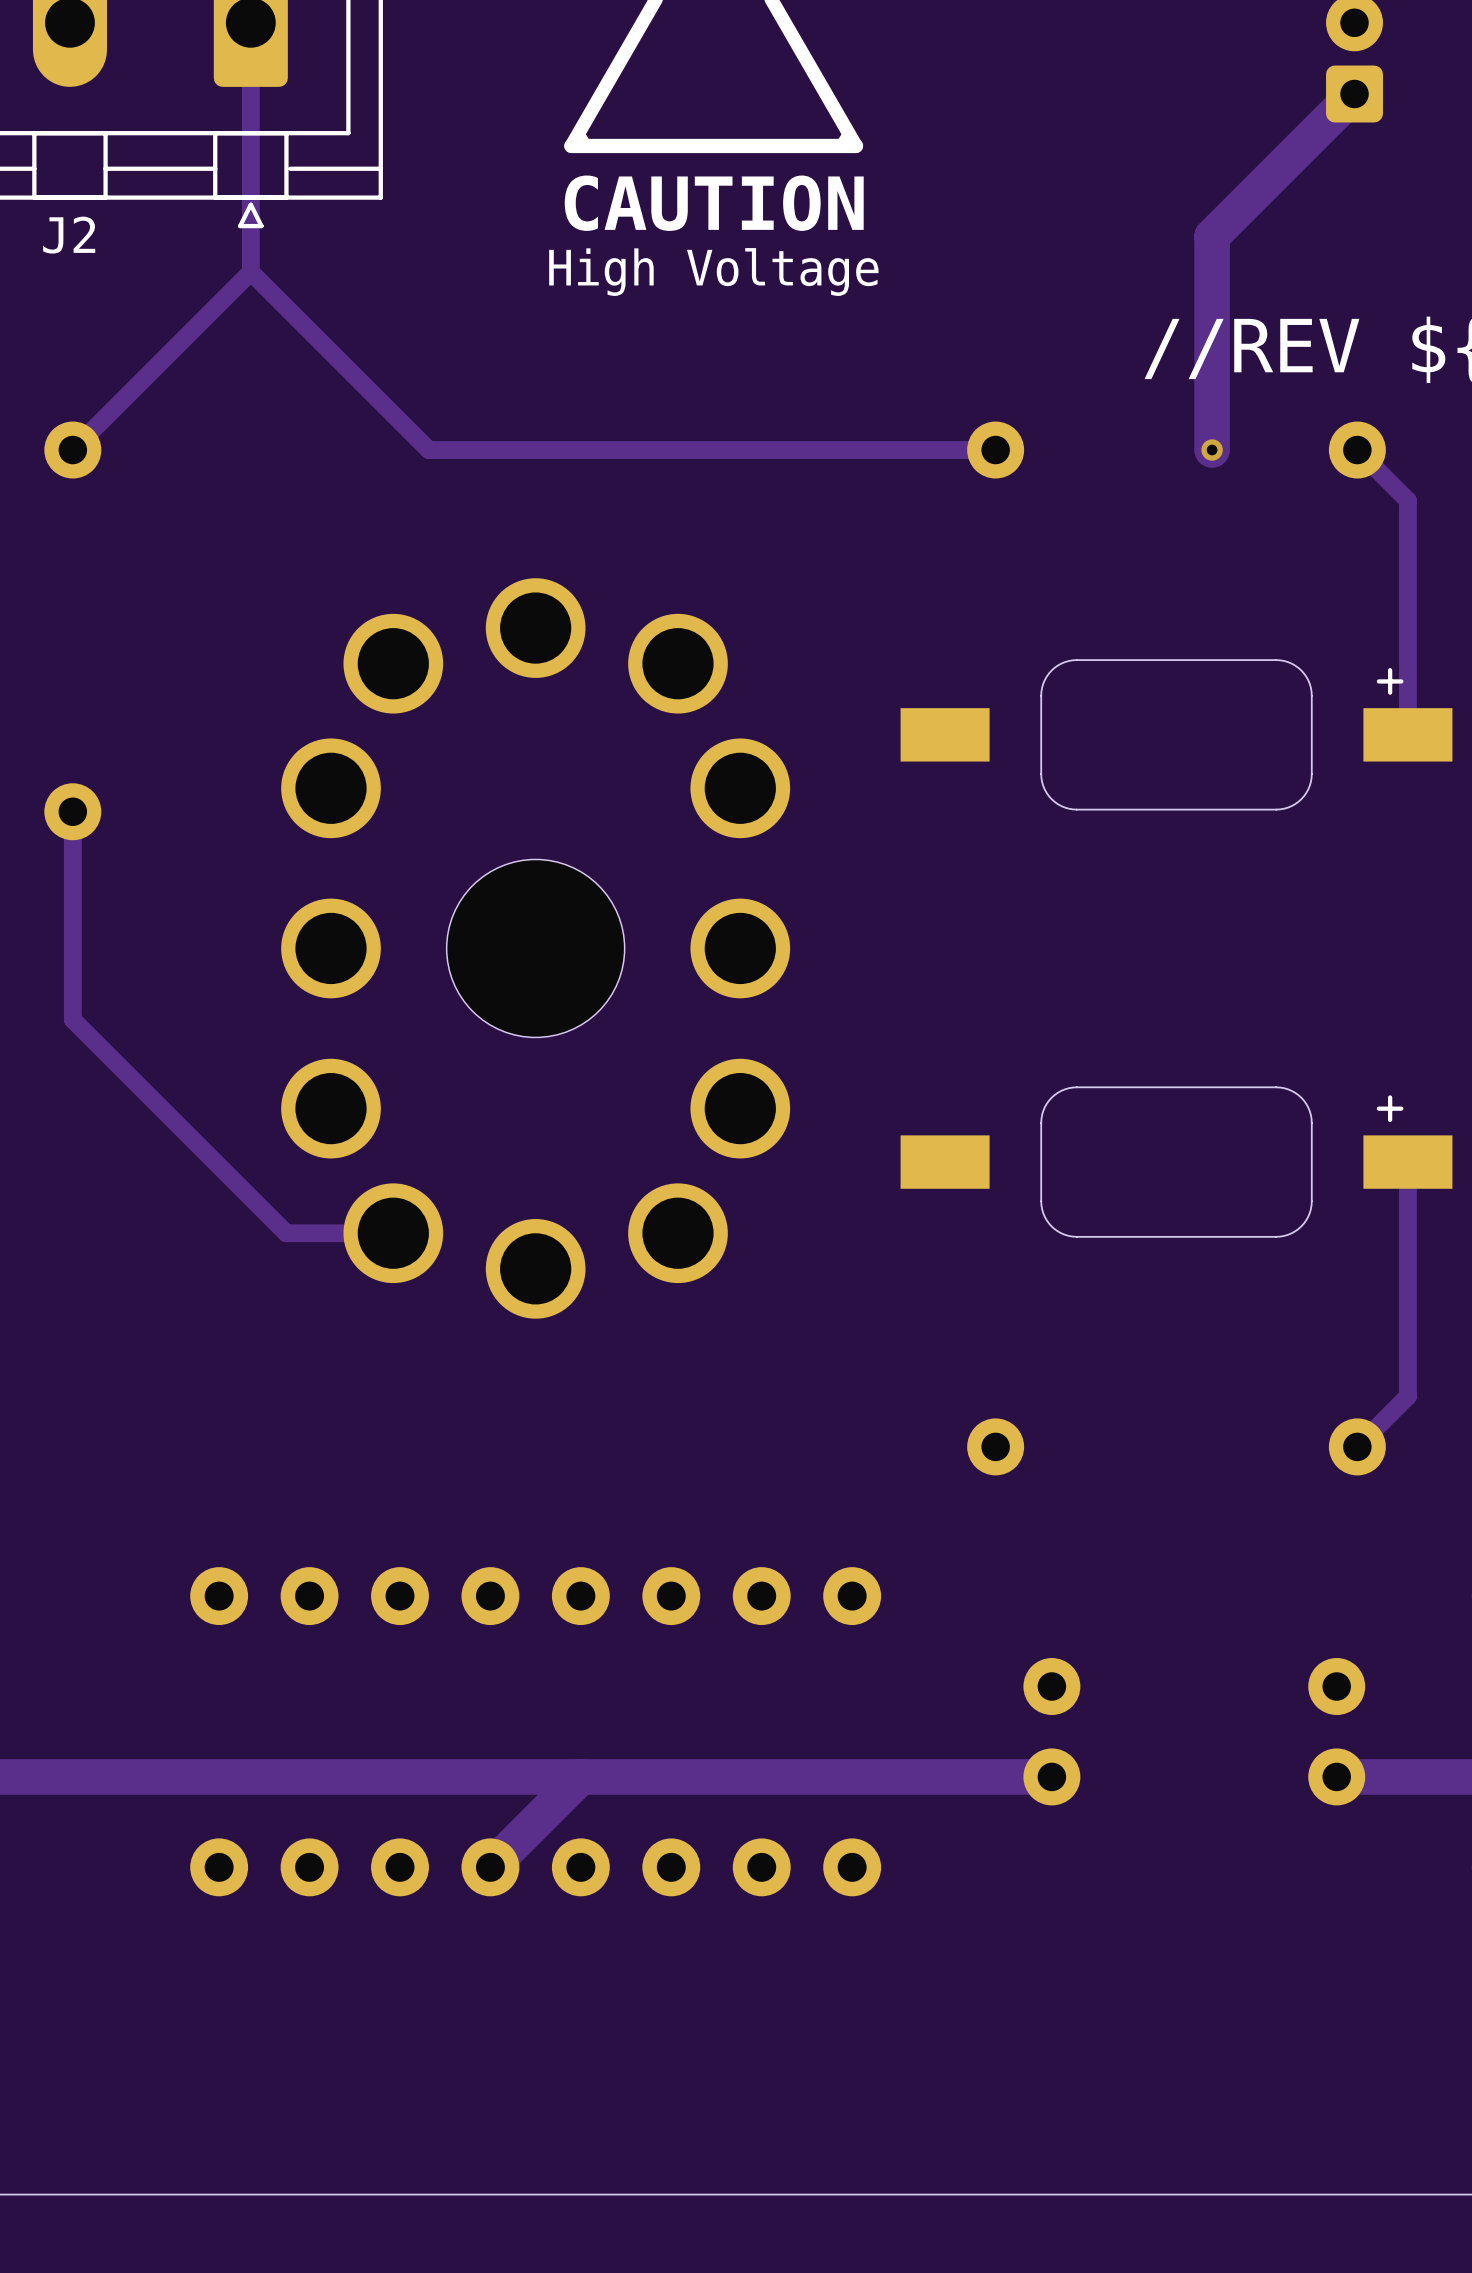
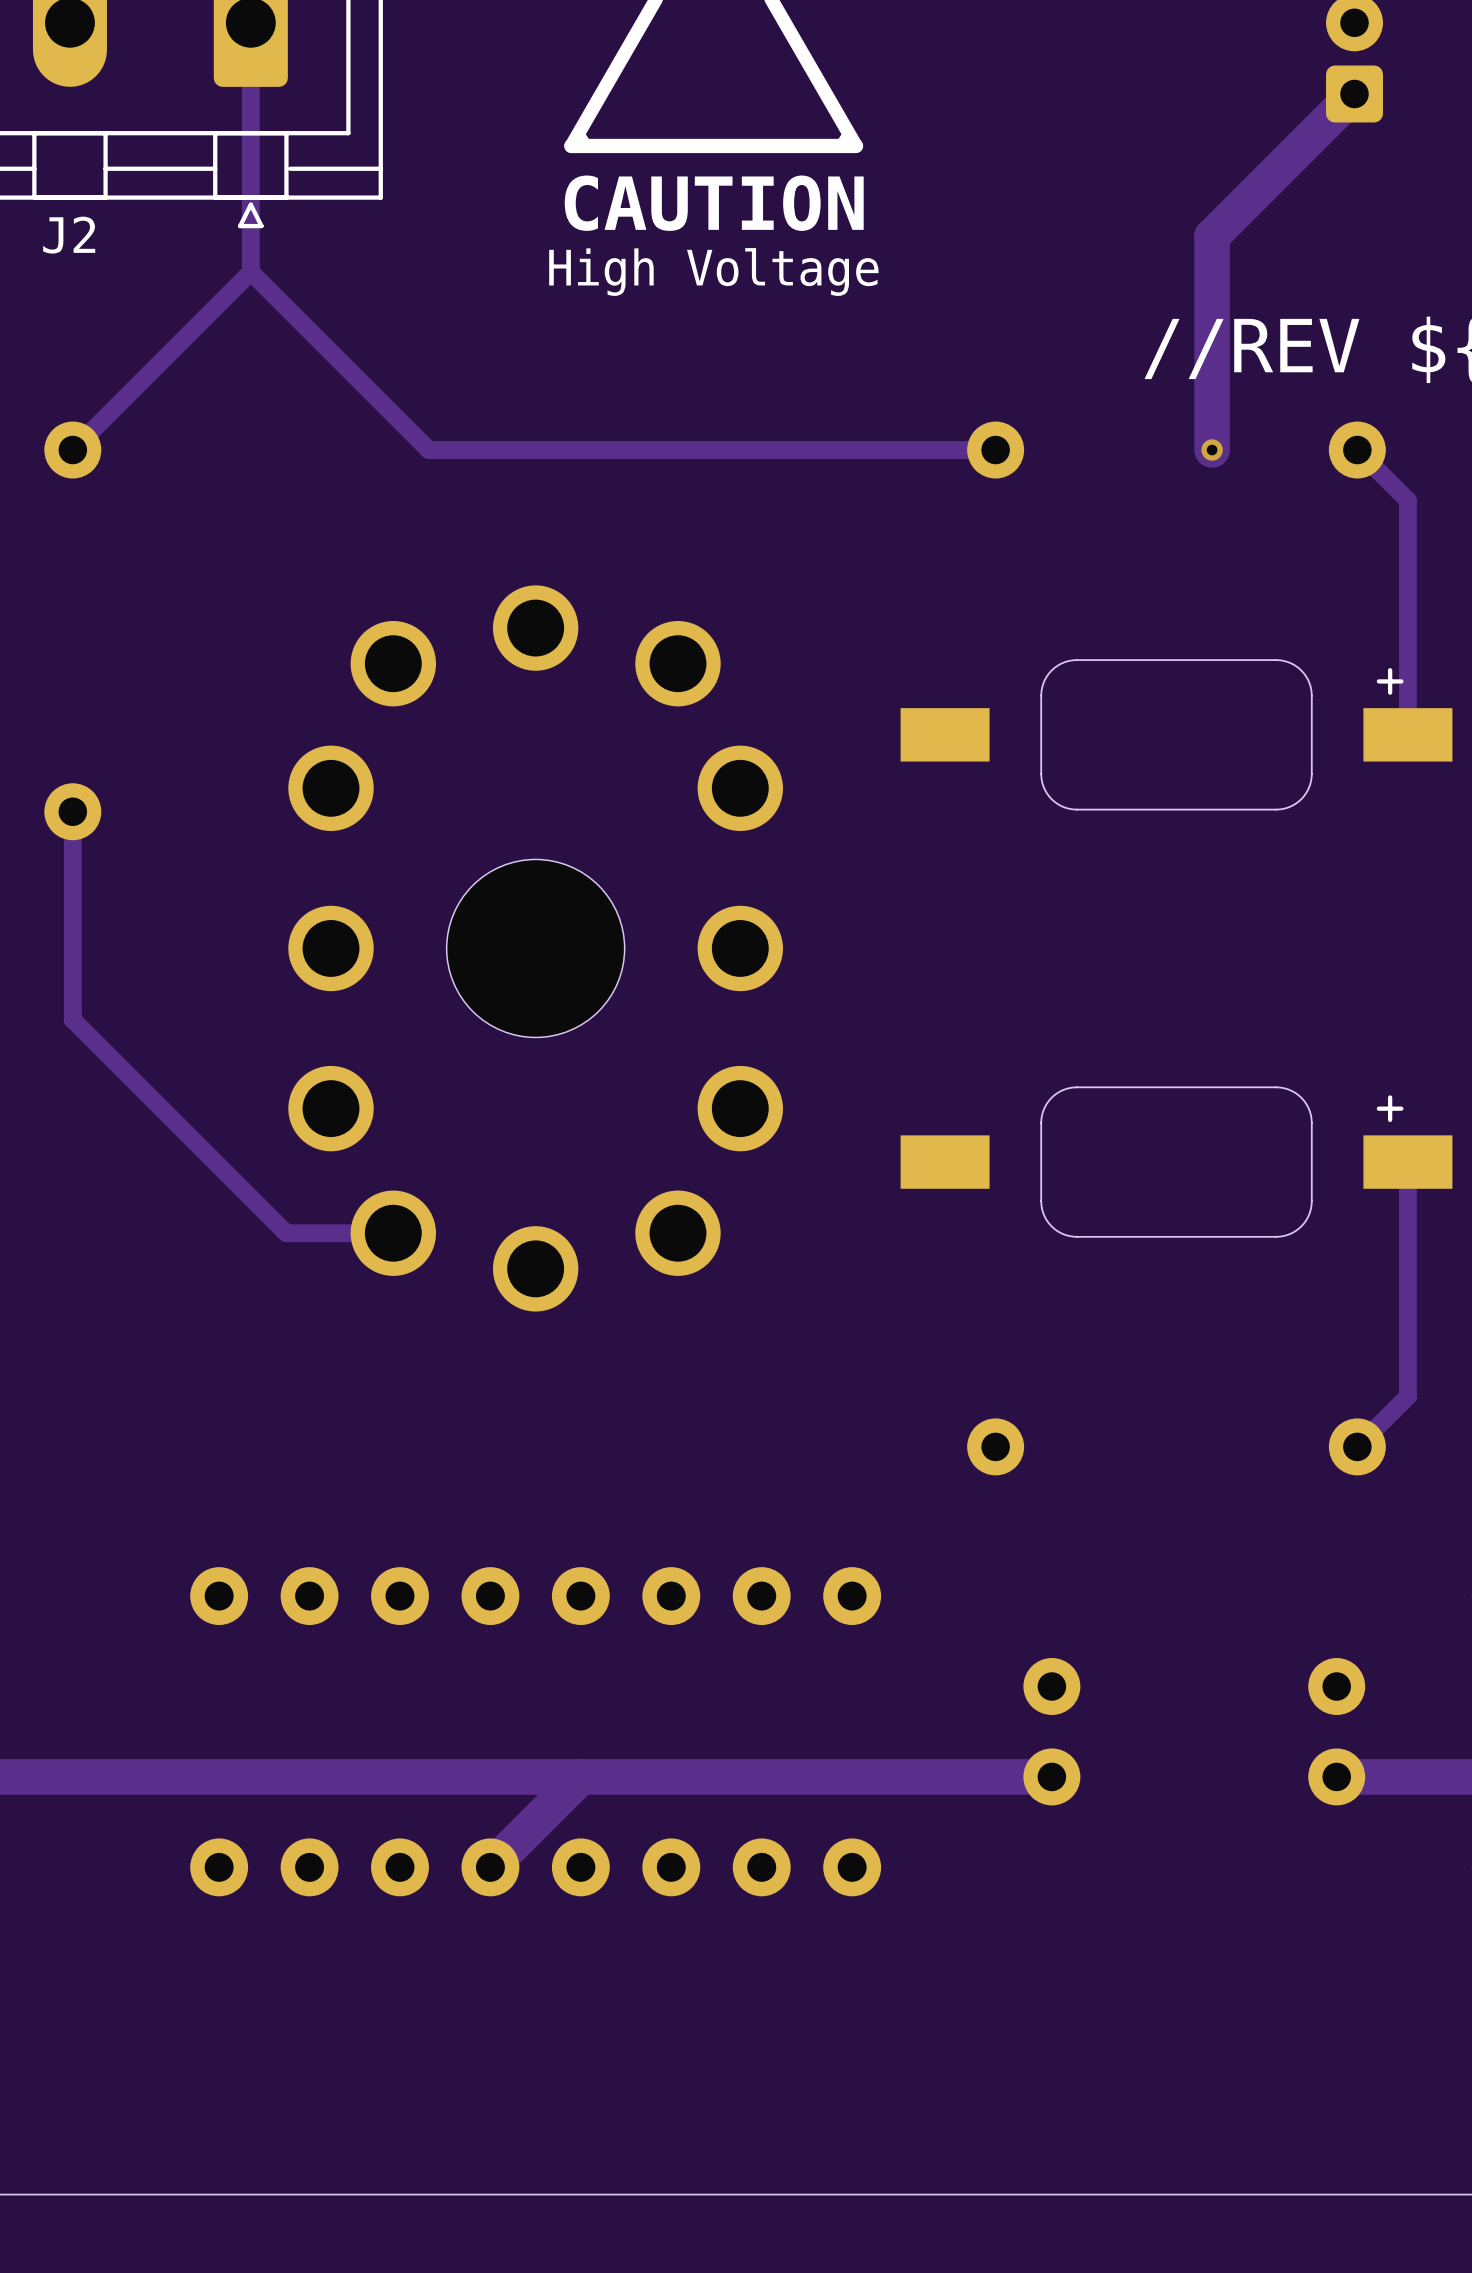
part footprint: [281, 578, 791, 1319] -> [288, 585, 783, 1312]

